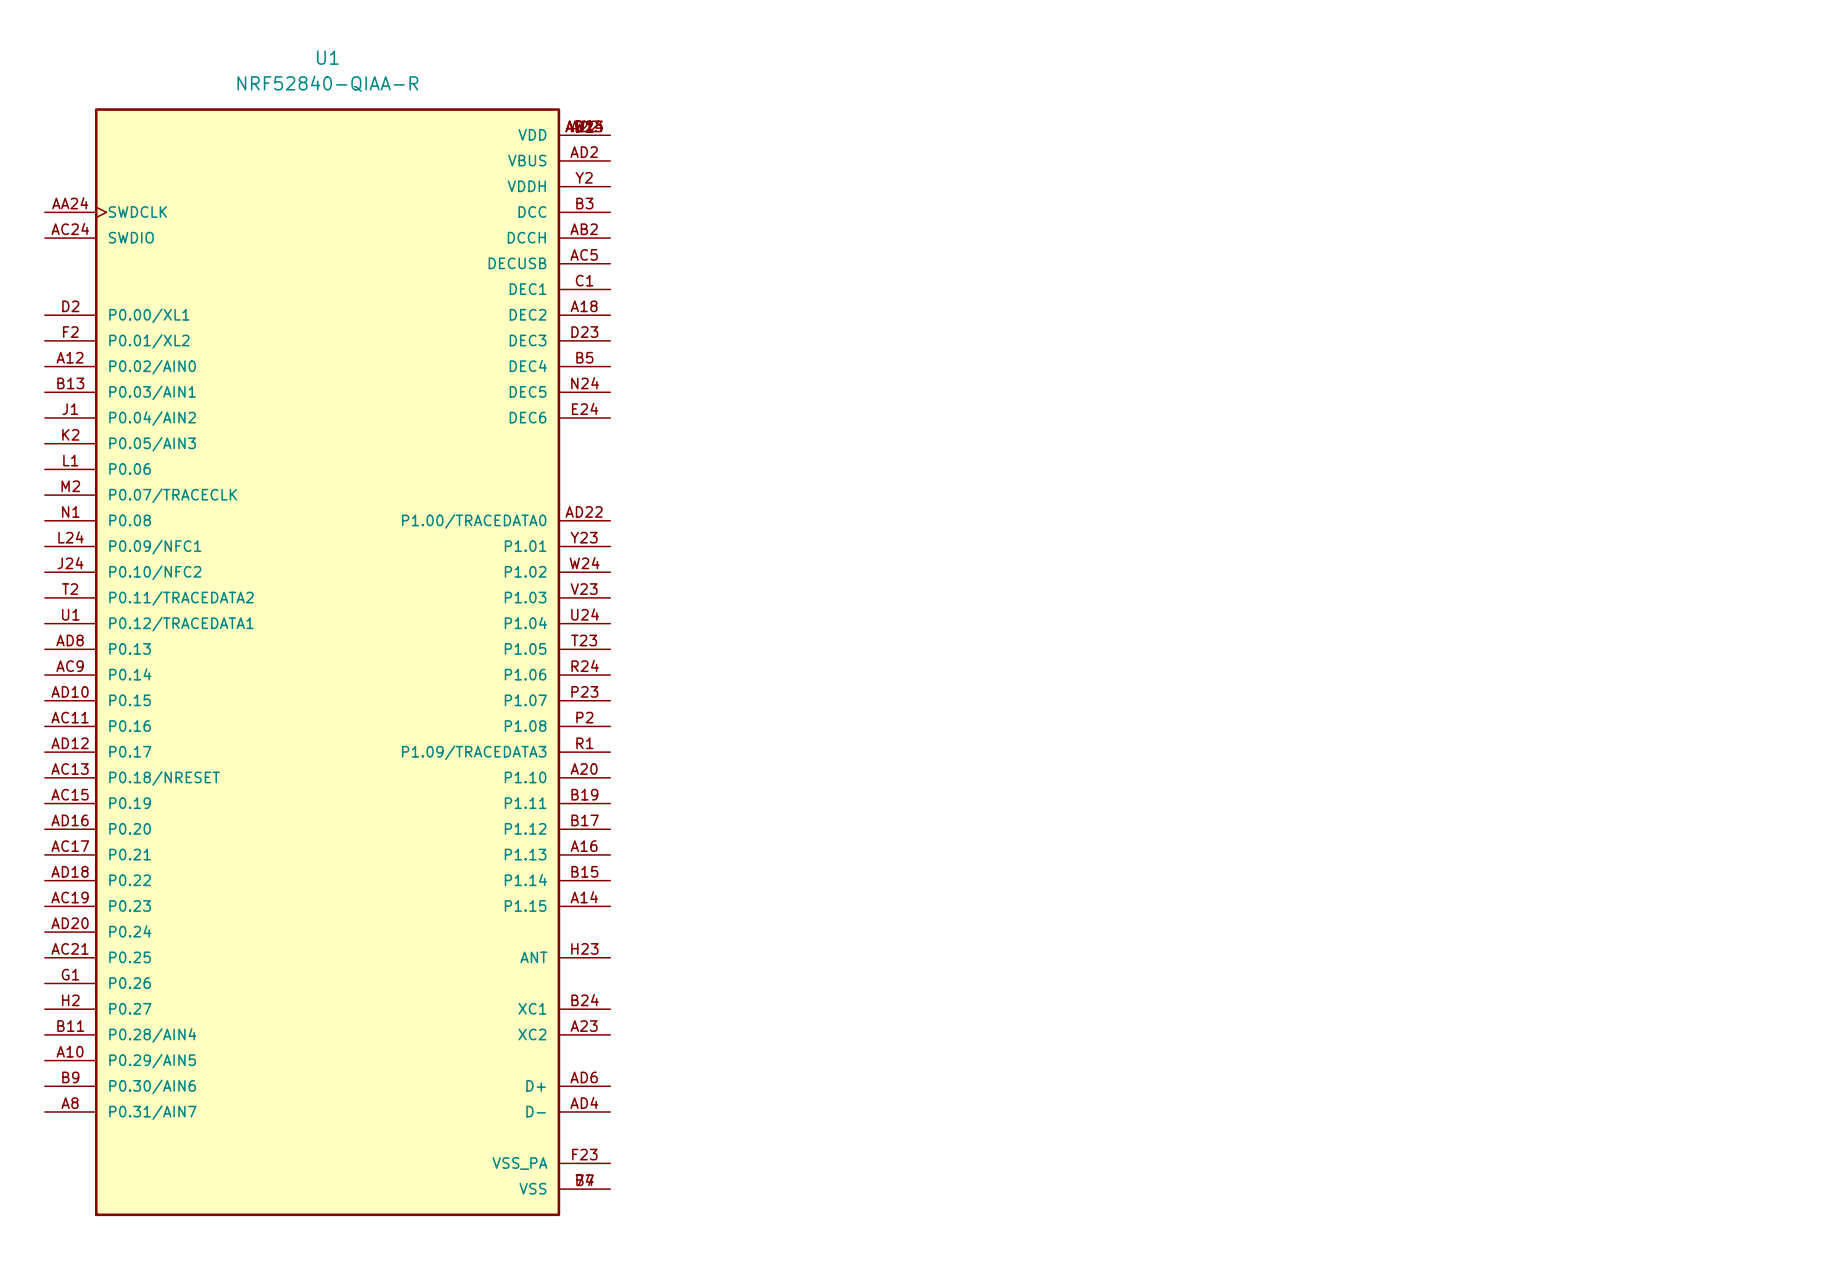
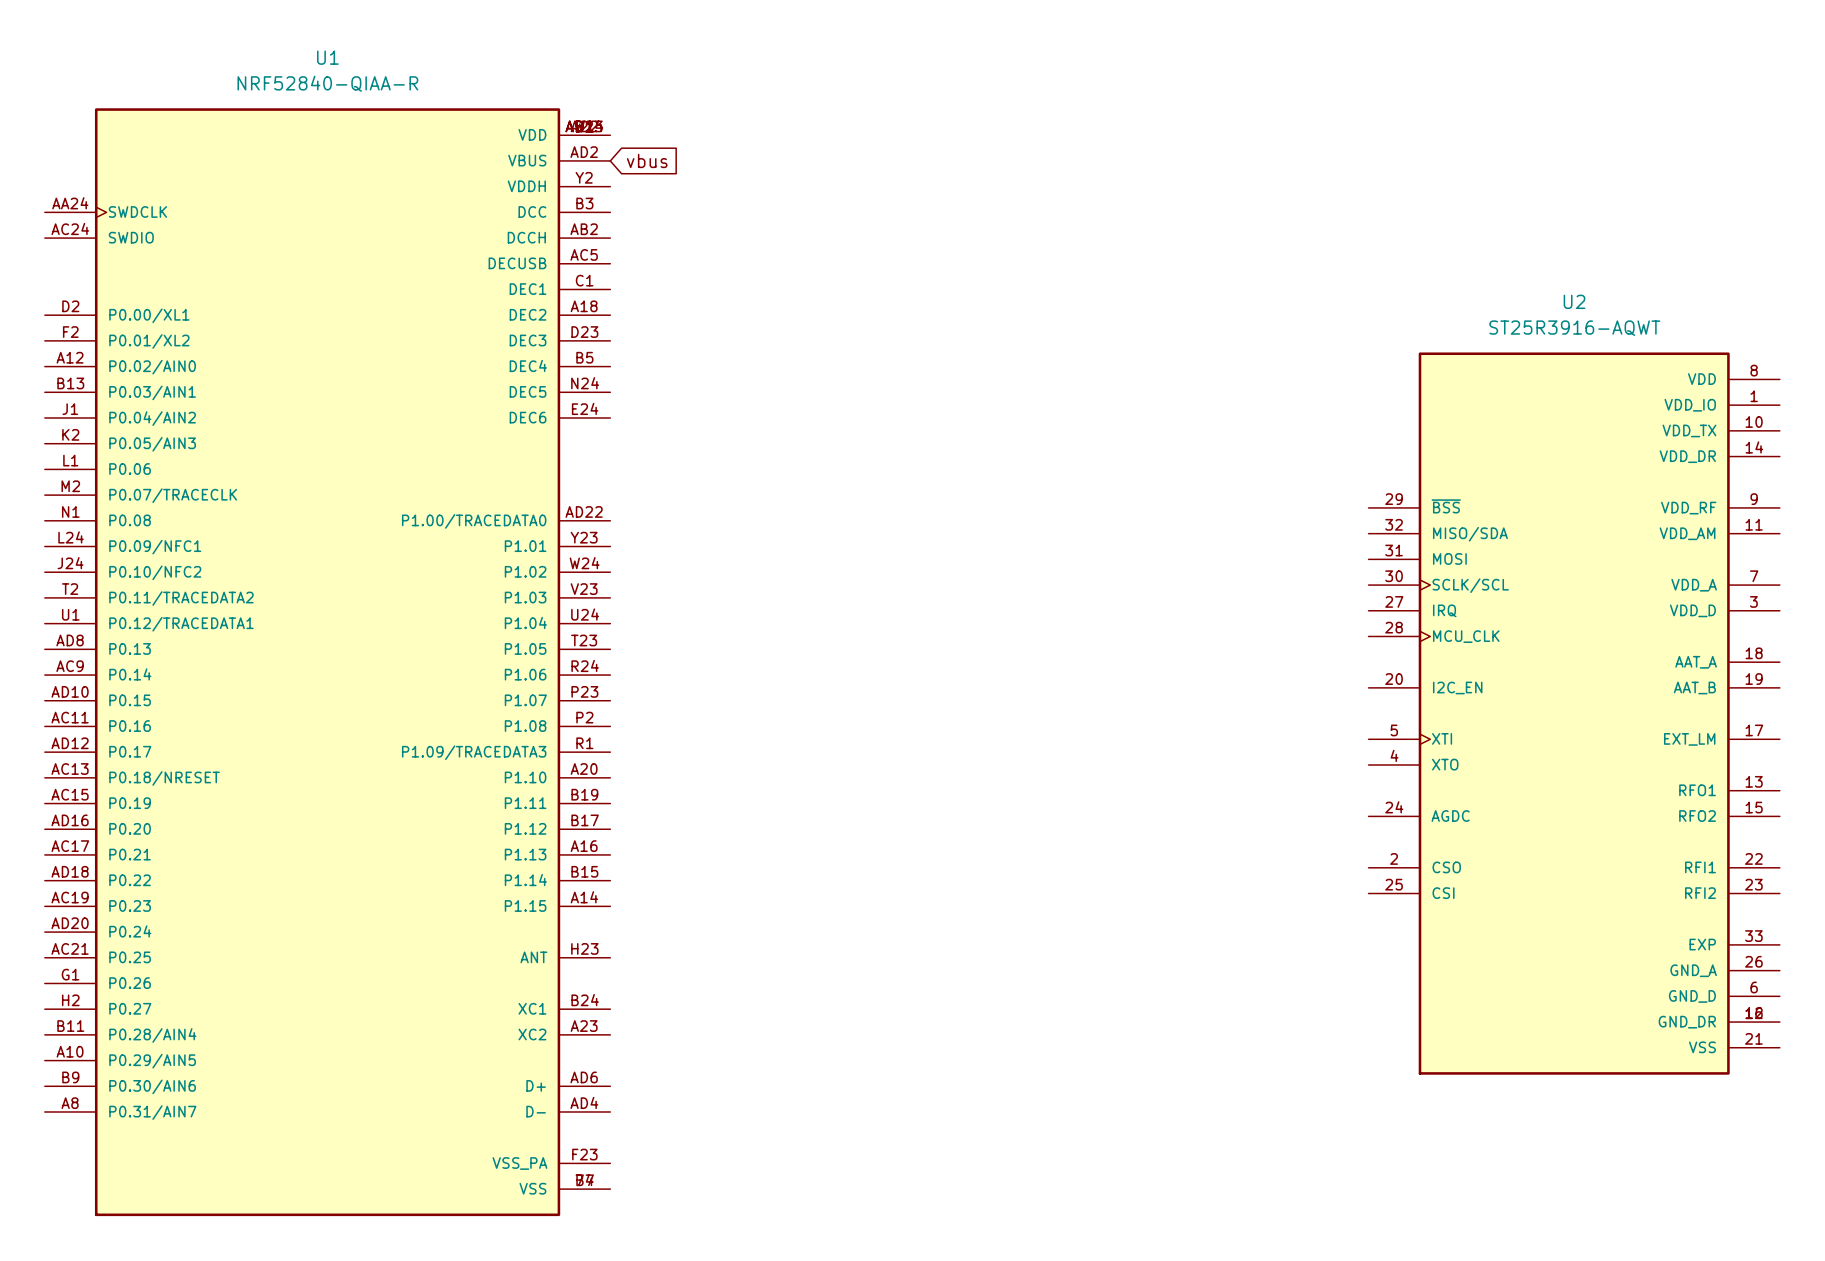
global label: none -> vbus (647, 160)
U2: none -> ST25R3916-AQWT (1574, 713)

